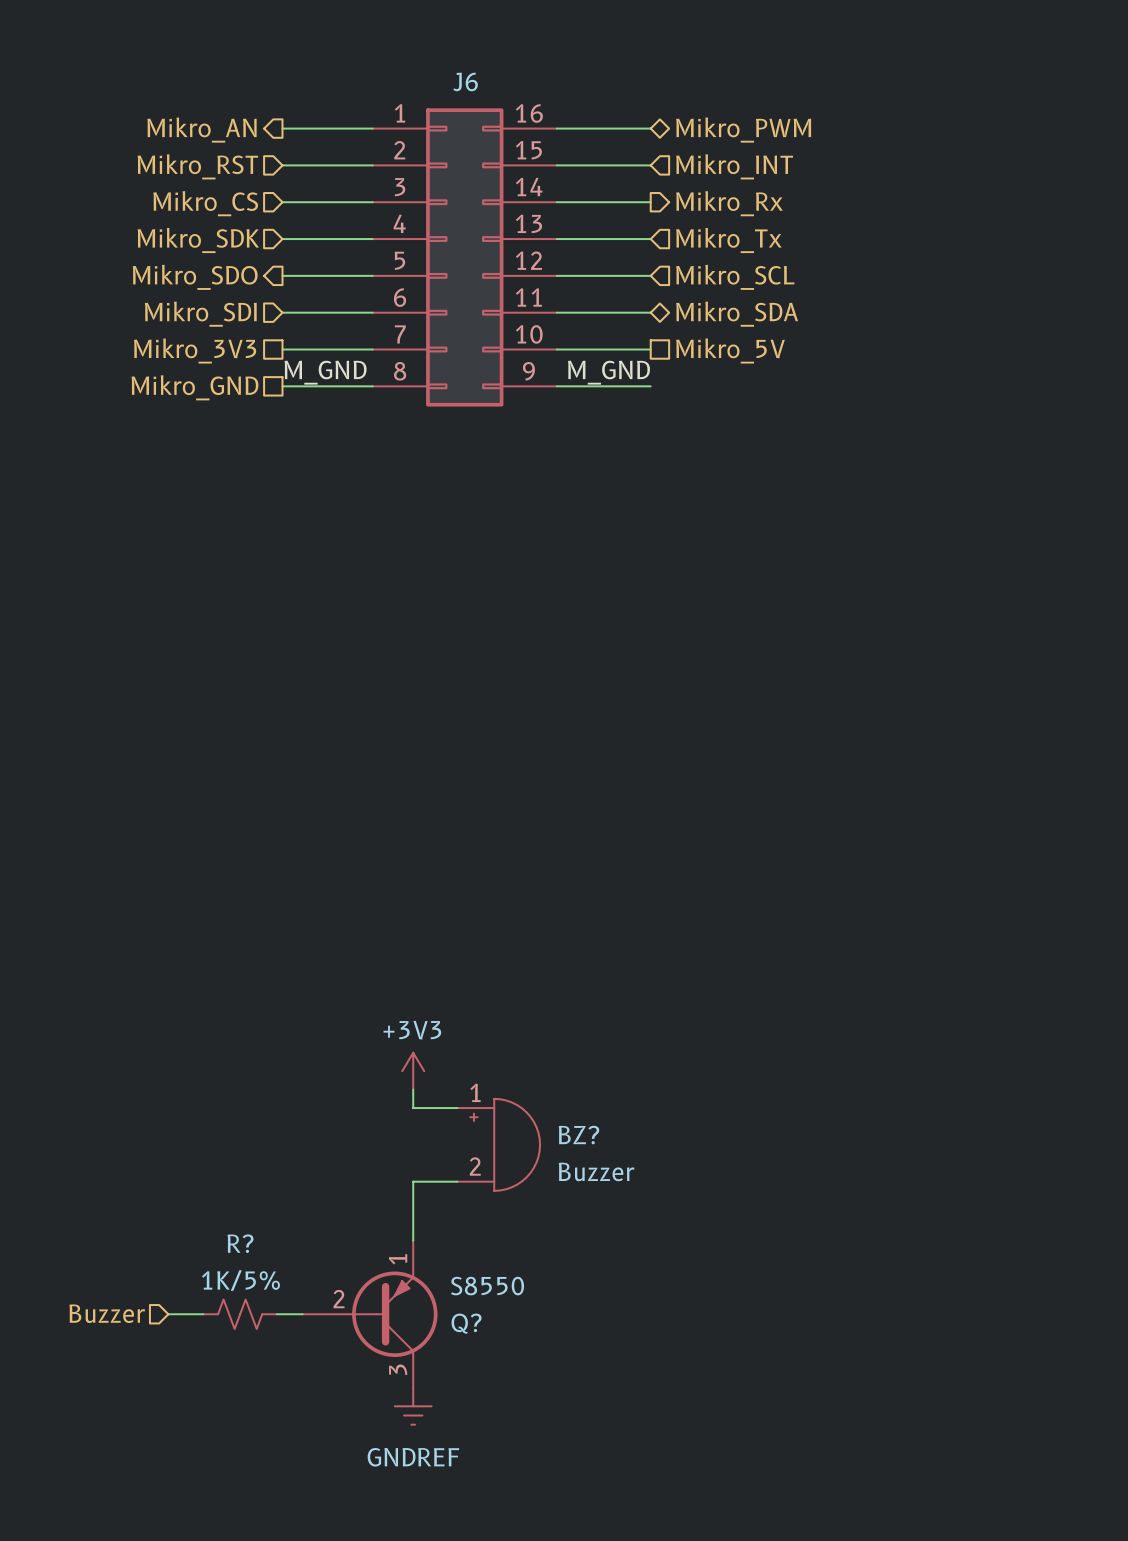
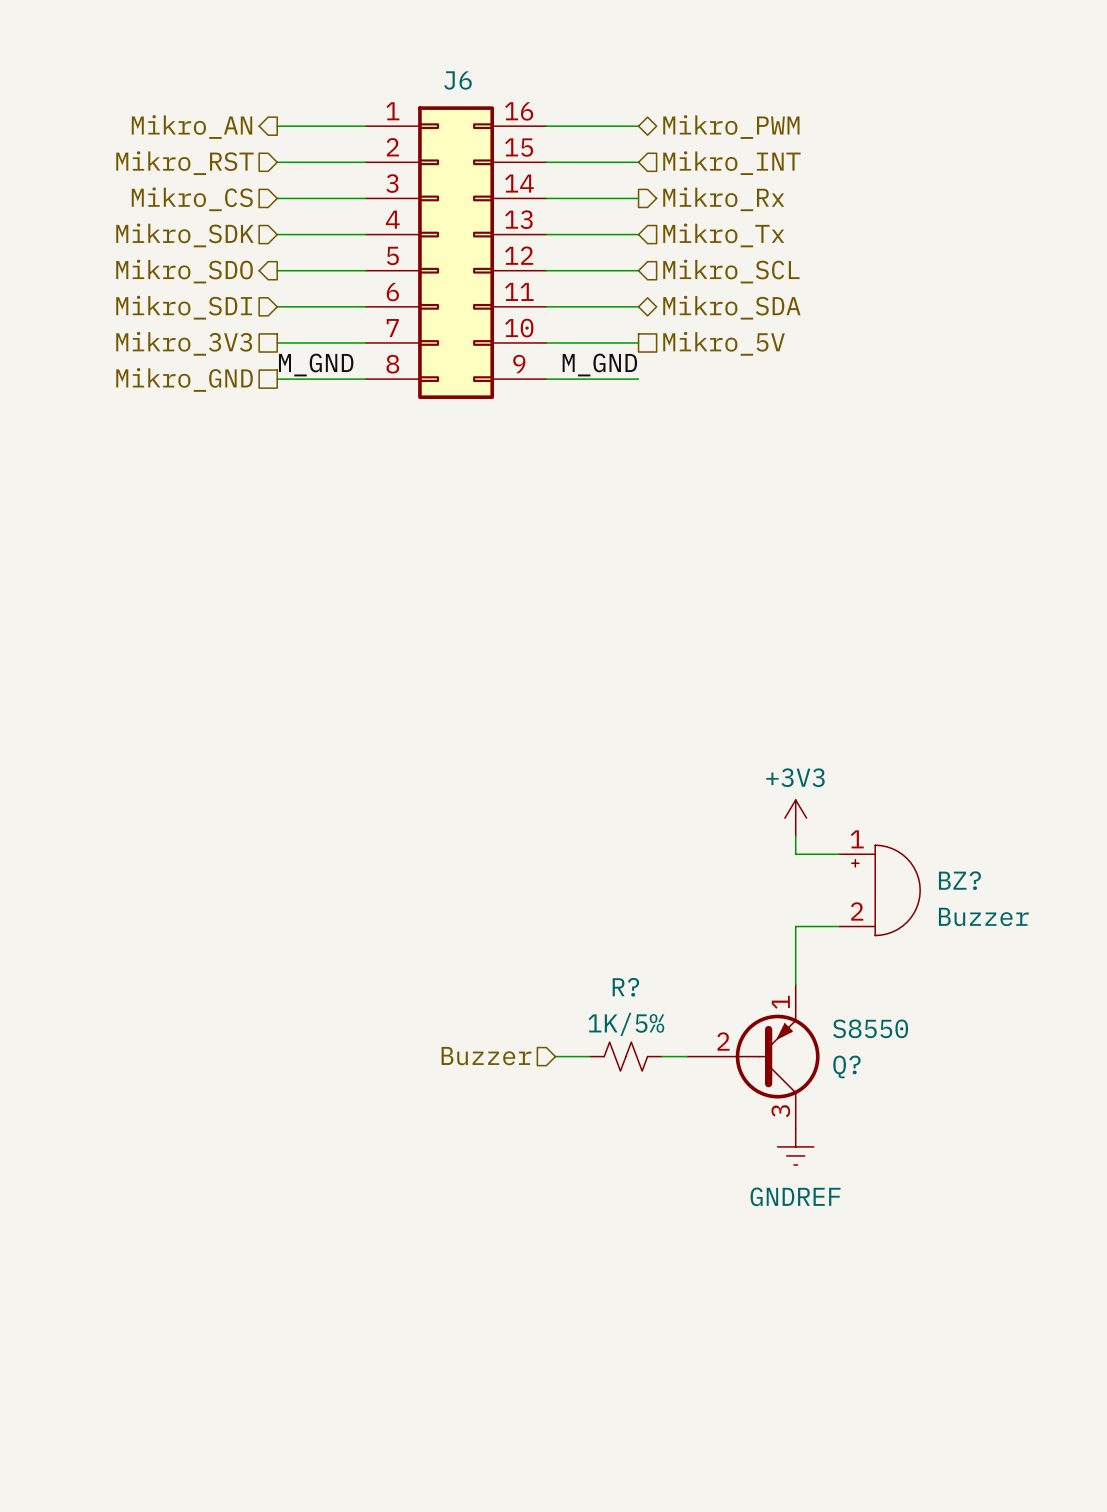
power symbol: none -> +3V3 (795, 818)
wire: none -> (795, 836) (795, 854) (839, 854)
BZ?: none -> Buzzer (879, 890)
wire: none -> (839, 926) (795, 926) (795, 984)
power symbol: +3V3 (413, 1071) -> none
hierarchical label: none -> Buzzer (486, 1056)
wire: none -> (555, 1056) (589, 1056)
R?: none -> 1K/5% (625, 1056)
wire: none -> (662, 1056) (687, 1056)
Q?: none -> S8550 (753, 1056)
wire: (413, 1089) (413, 1108) (457, 1108) -> none
BZ?: Buzzer (498, 1144) -> none
power symbol: none -> GNDREF (795, 1146)
wire: (457, 1181) (413, 1181) (413, 1240) -> none
hierarchical label: Buzzer (107, 1313) -> none
wire: (168, 1314) (203, 1314) -> none
R?: 1K/5% (240, 1314) -> none
wire: (276, 1314) (302, 1314) -> none
Q?: S8550 (370, 1314) -> none
power symbol: GNDREF (413, 1406) -> none

